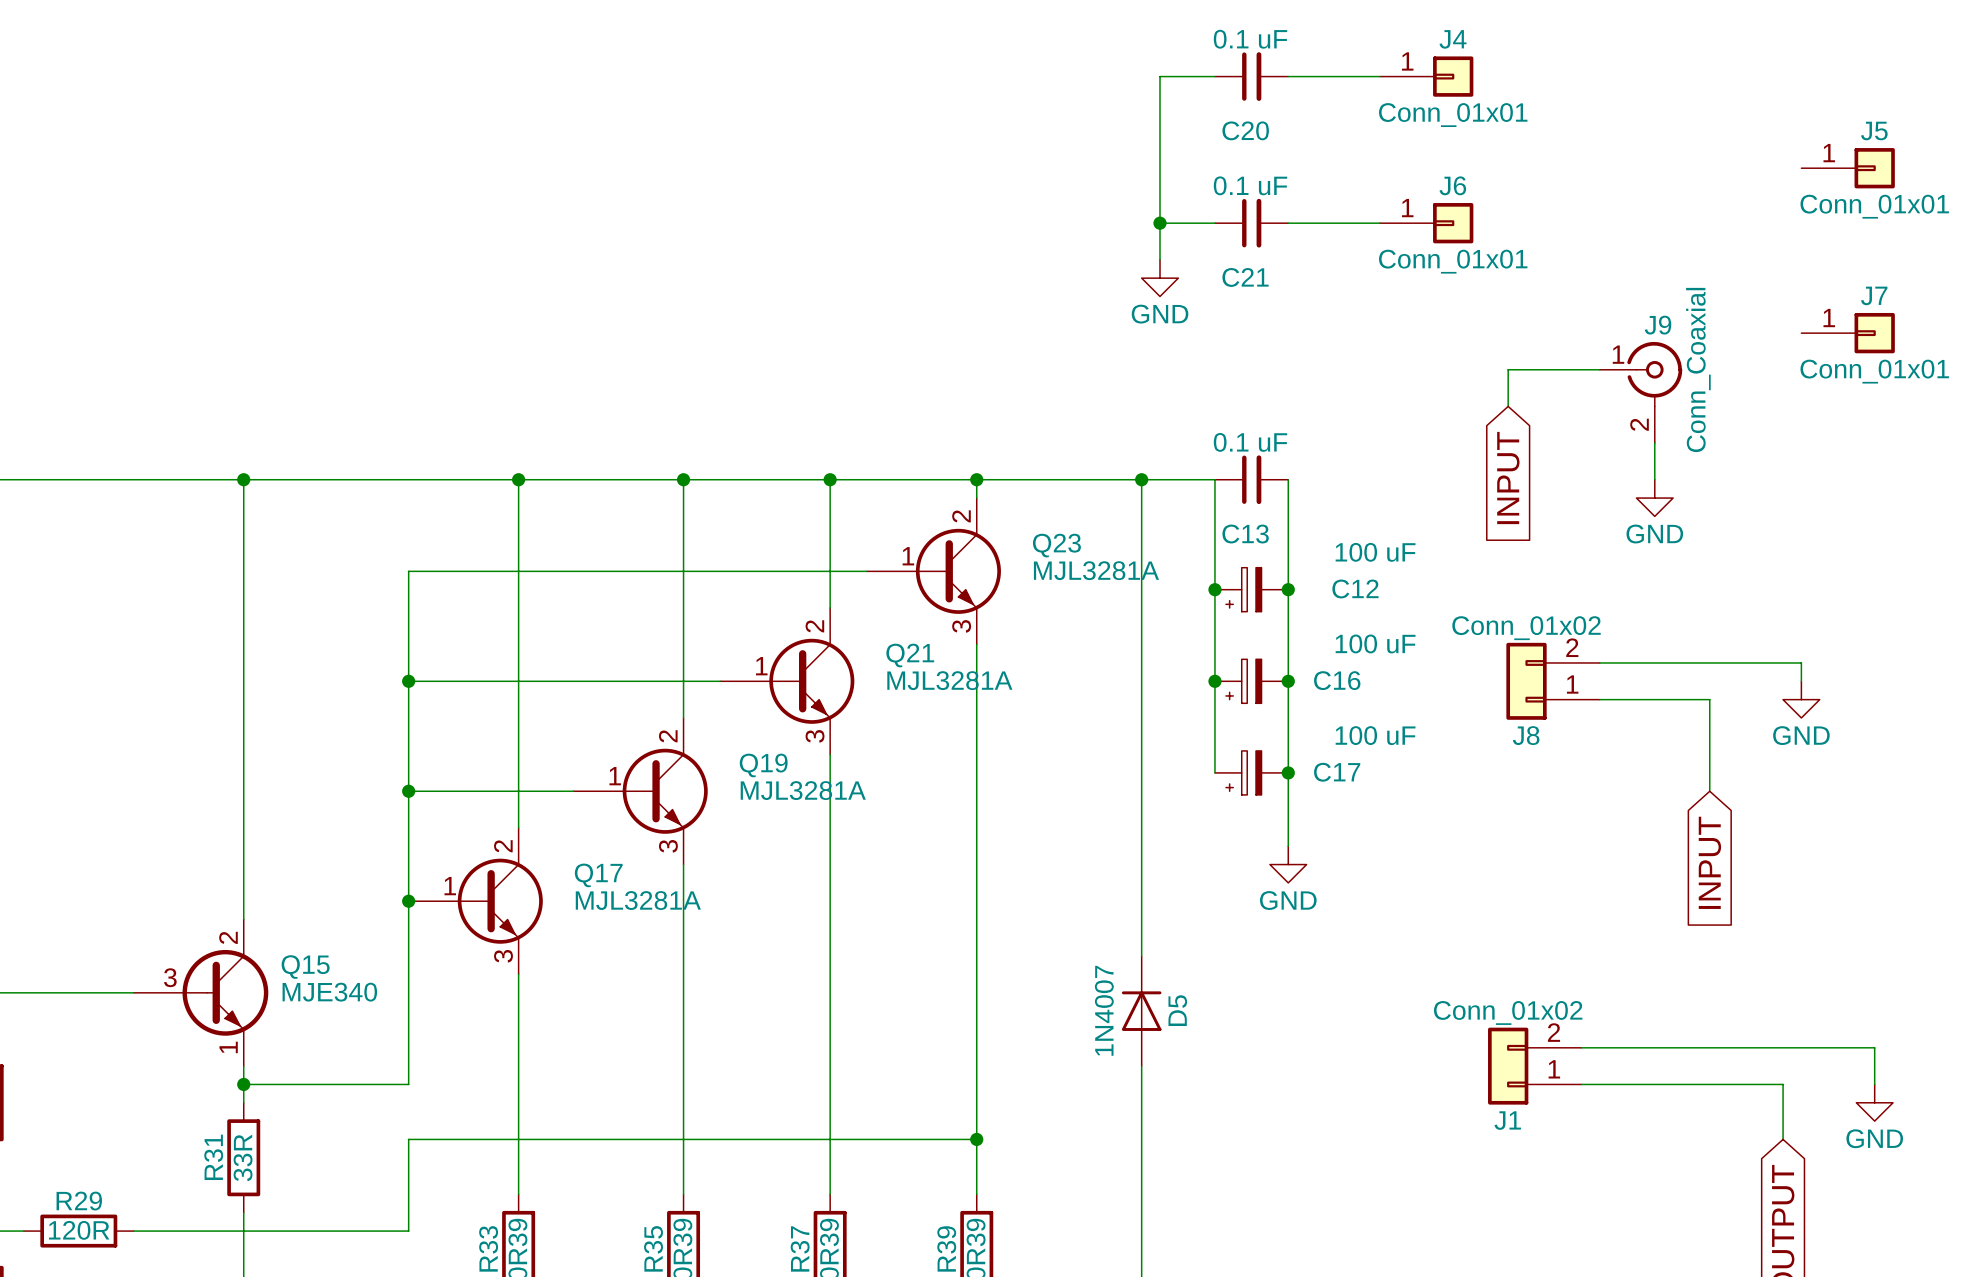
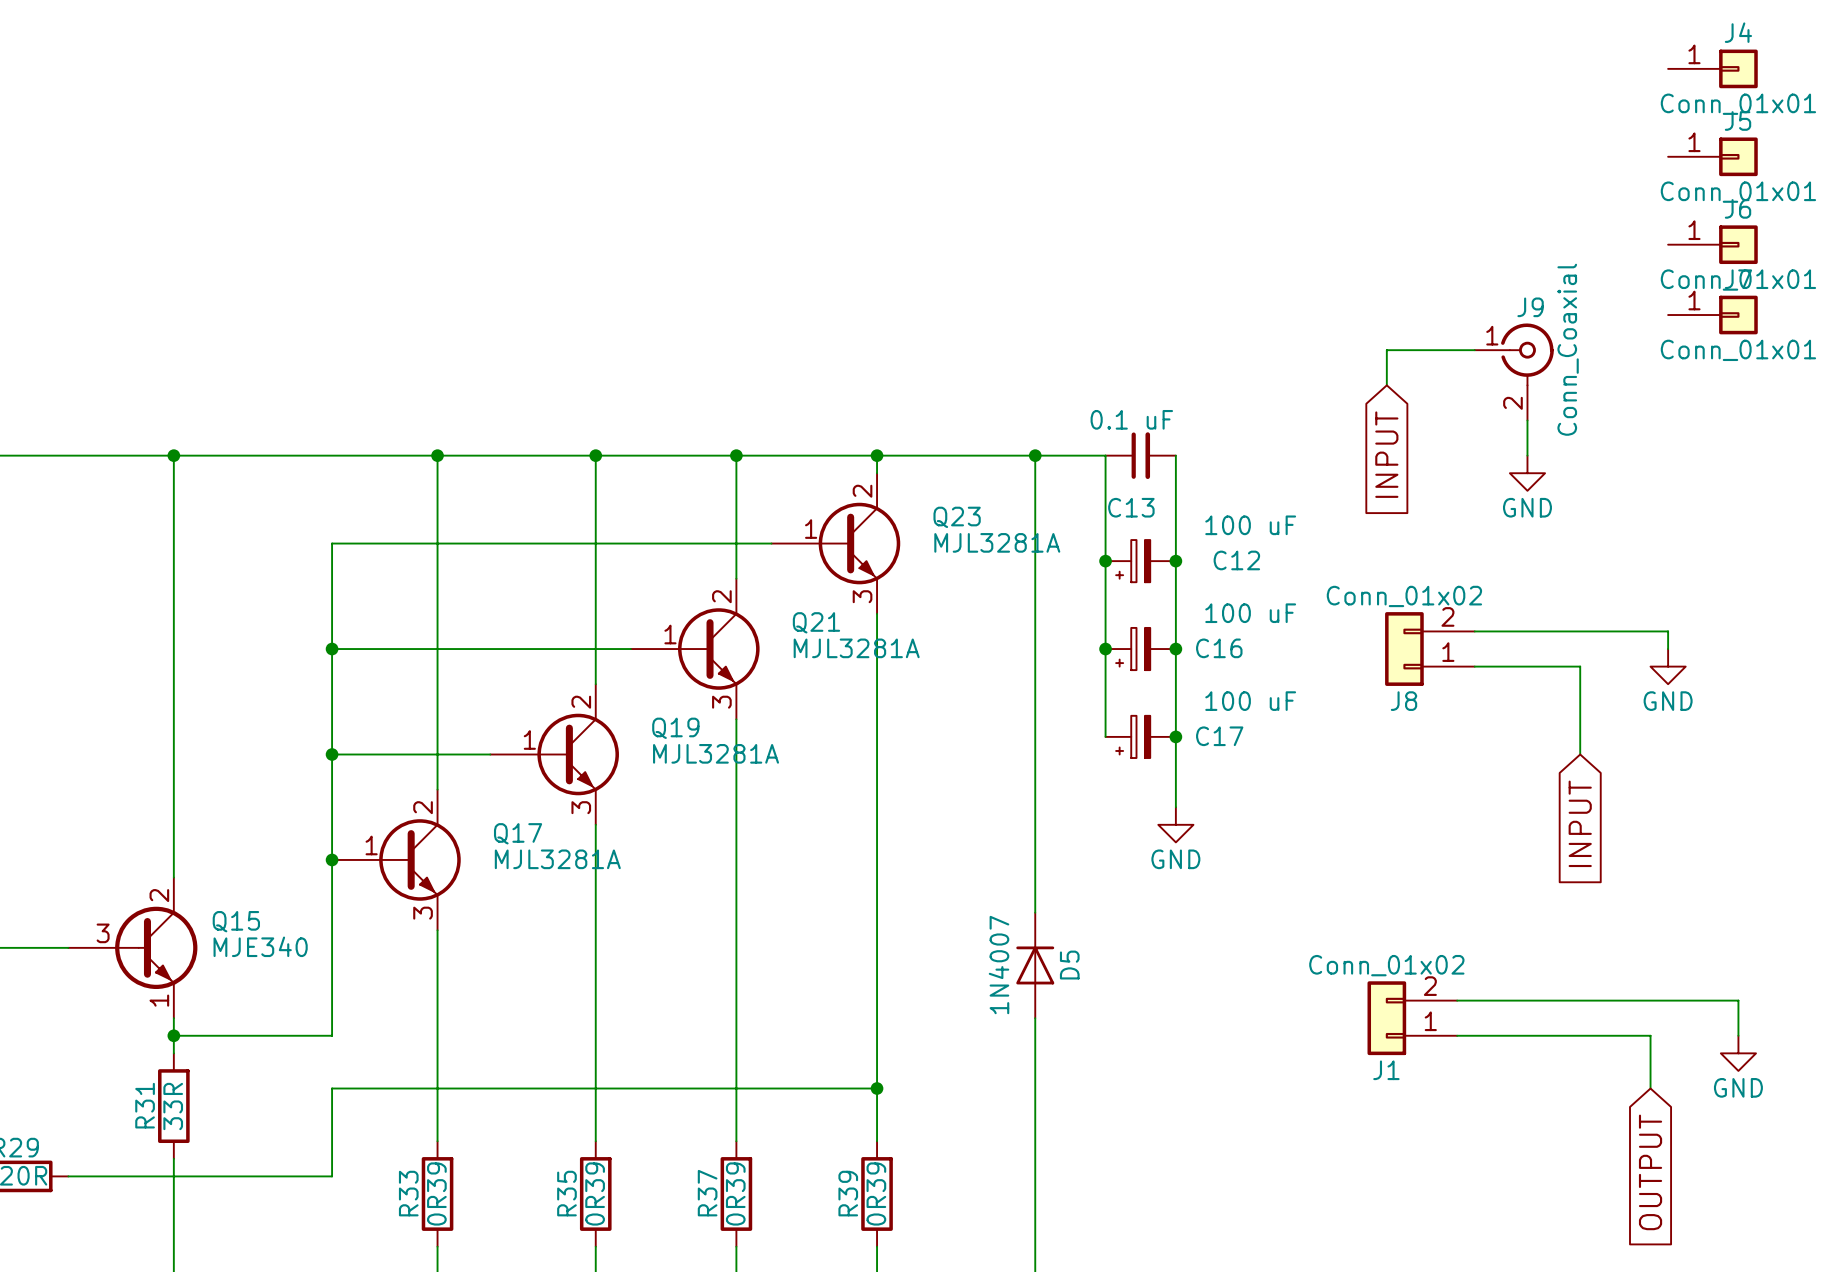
wire: (1214, 76) (1160, 76) (1160, 259) -> none
C20: 0.1 uF (1251, 76) -> none
wire: (1288, 76) (1379, 76) -> none
J4 position: (1426, 76) -> (1712, 68)
wire: (1160, 223) (1214, 223) -> none
junction: (1160, 223) -> none
C21: 0.1 uF (1251, 223) -> none
wire: (1288, 223) (1379, 223) -> none
J6 position: (1426, 223) -> (1712, 244)
power symbol: GND (1160, 278) -> none

